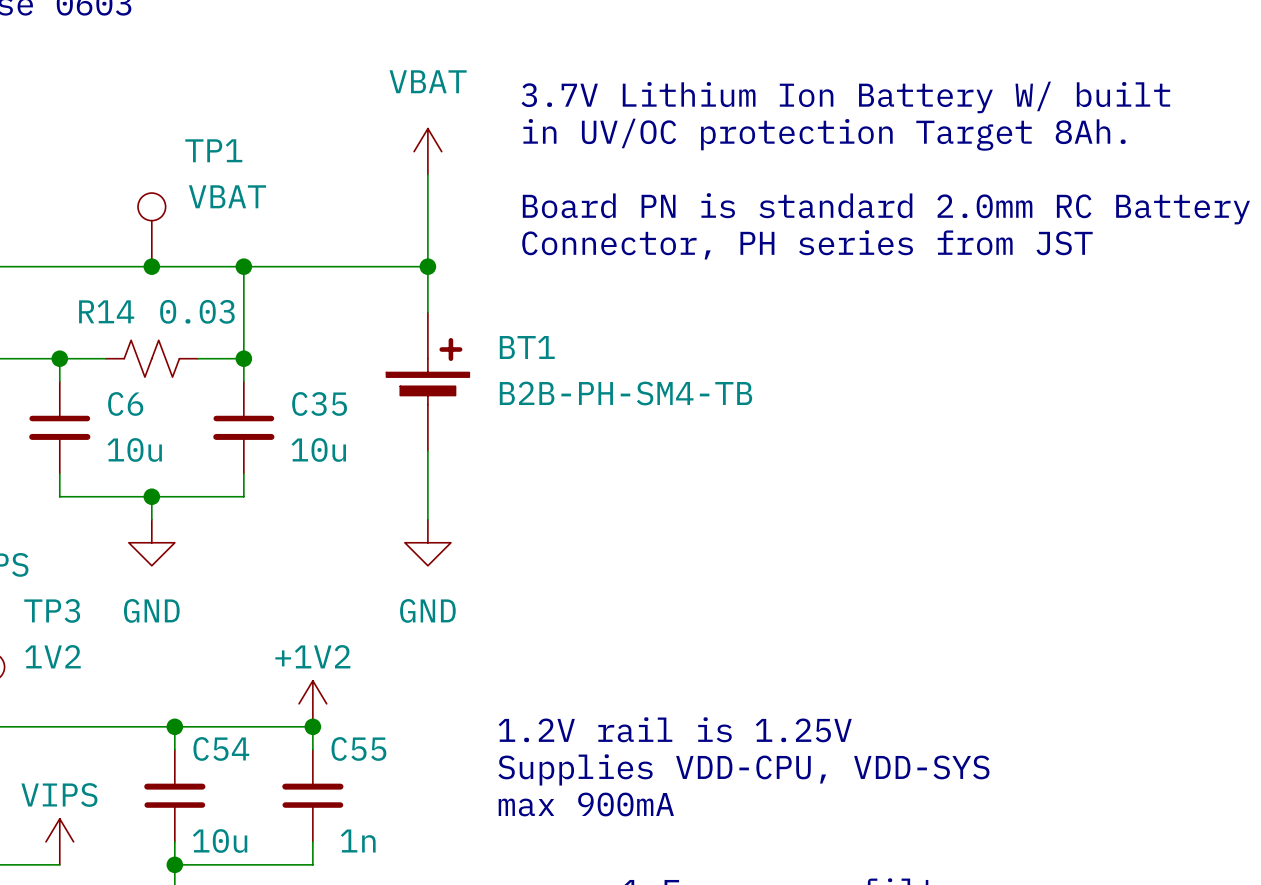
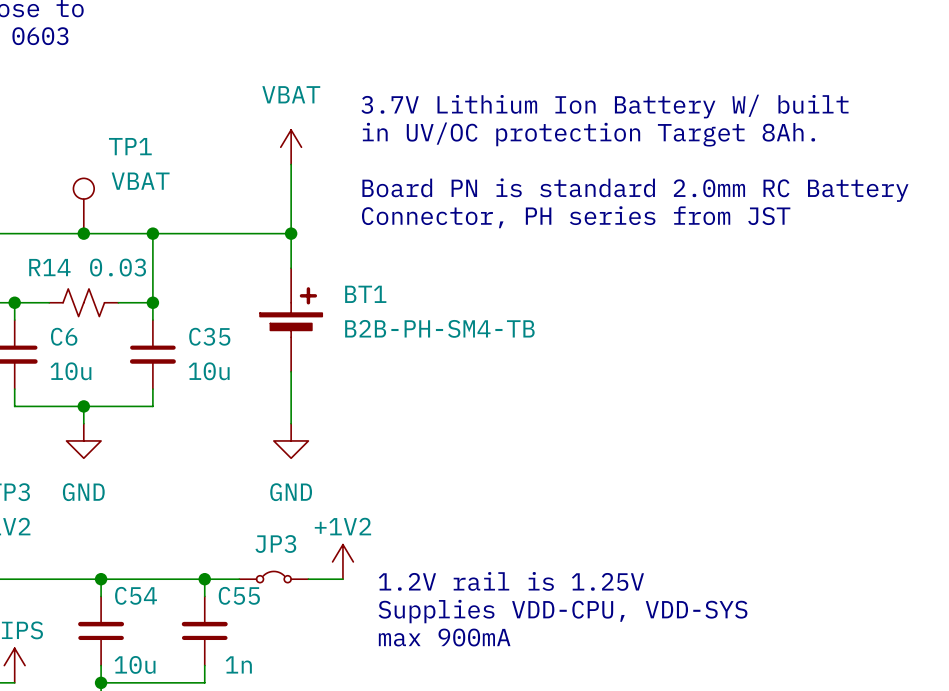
power symbol position: +1V2 (312, 703) -> +1V2 (342, 561)
JP3: none -> (273, 577)
wire: none -> (204, 579) (239, 579)
wire: none -> (308, 579) (342, 579)
text position: 1.2V rail is 1.25V (675, 729) -> 1.2V rail is 1.25V (511, 581)
text position: Supplies VDD-CPU, VDD-SYS (743, 769) -> Supplies VDD-CPU, VDD-SYS (563, 611)
text position: max 900mA (586, 804) -> max 900mA (444, 637)

